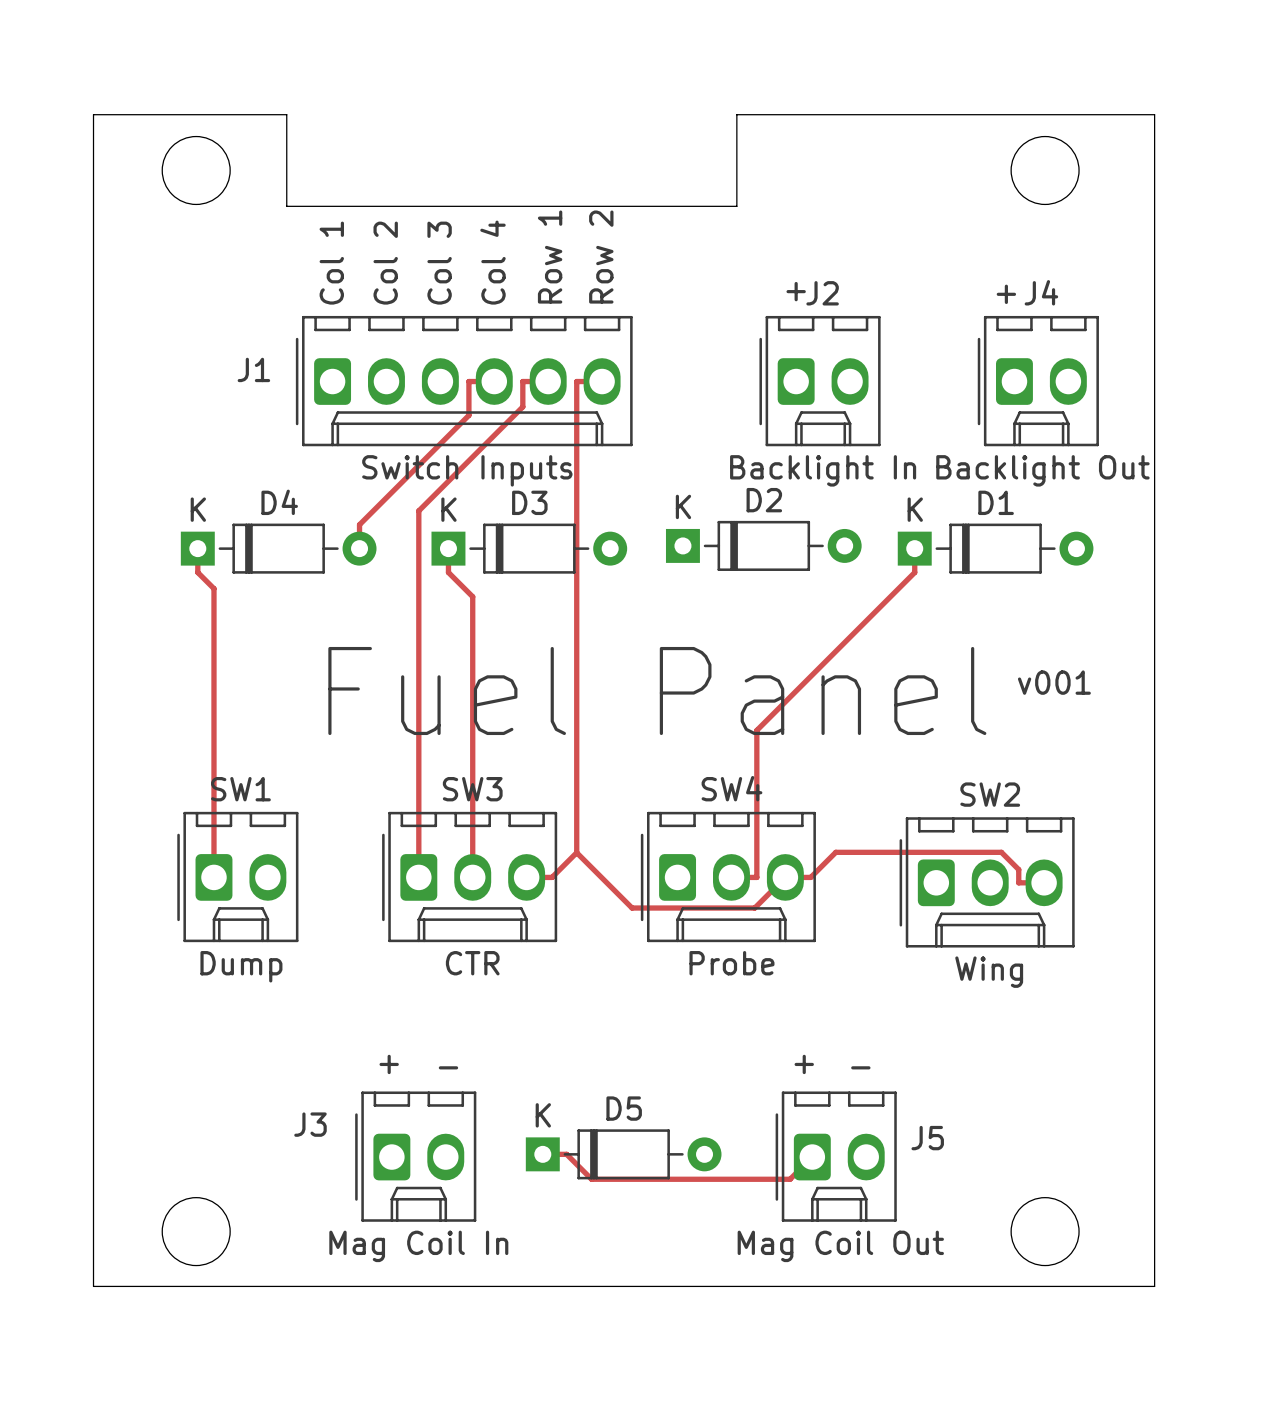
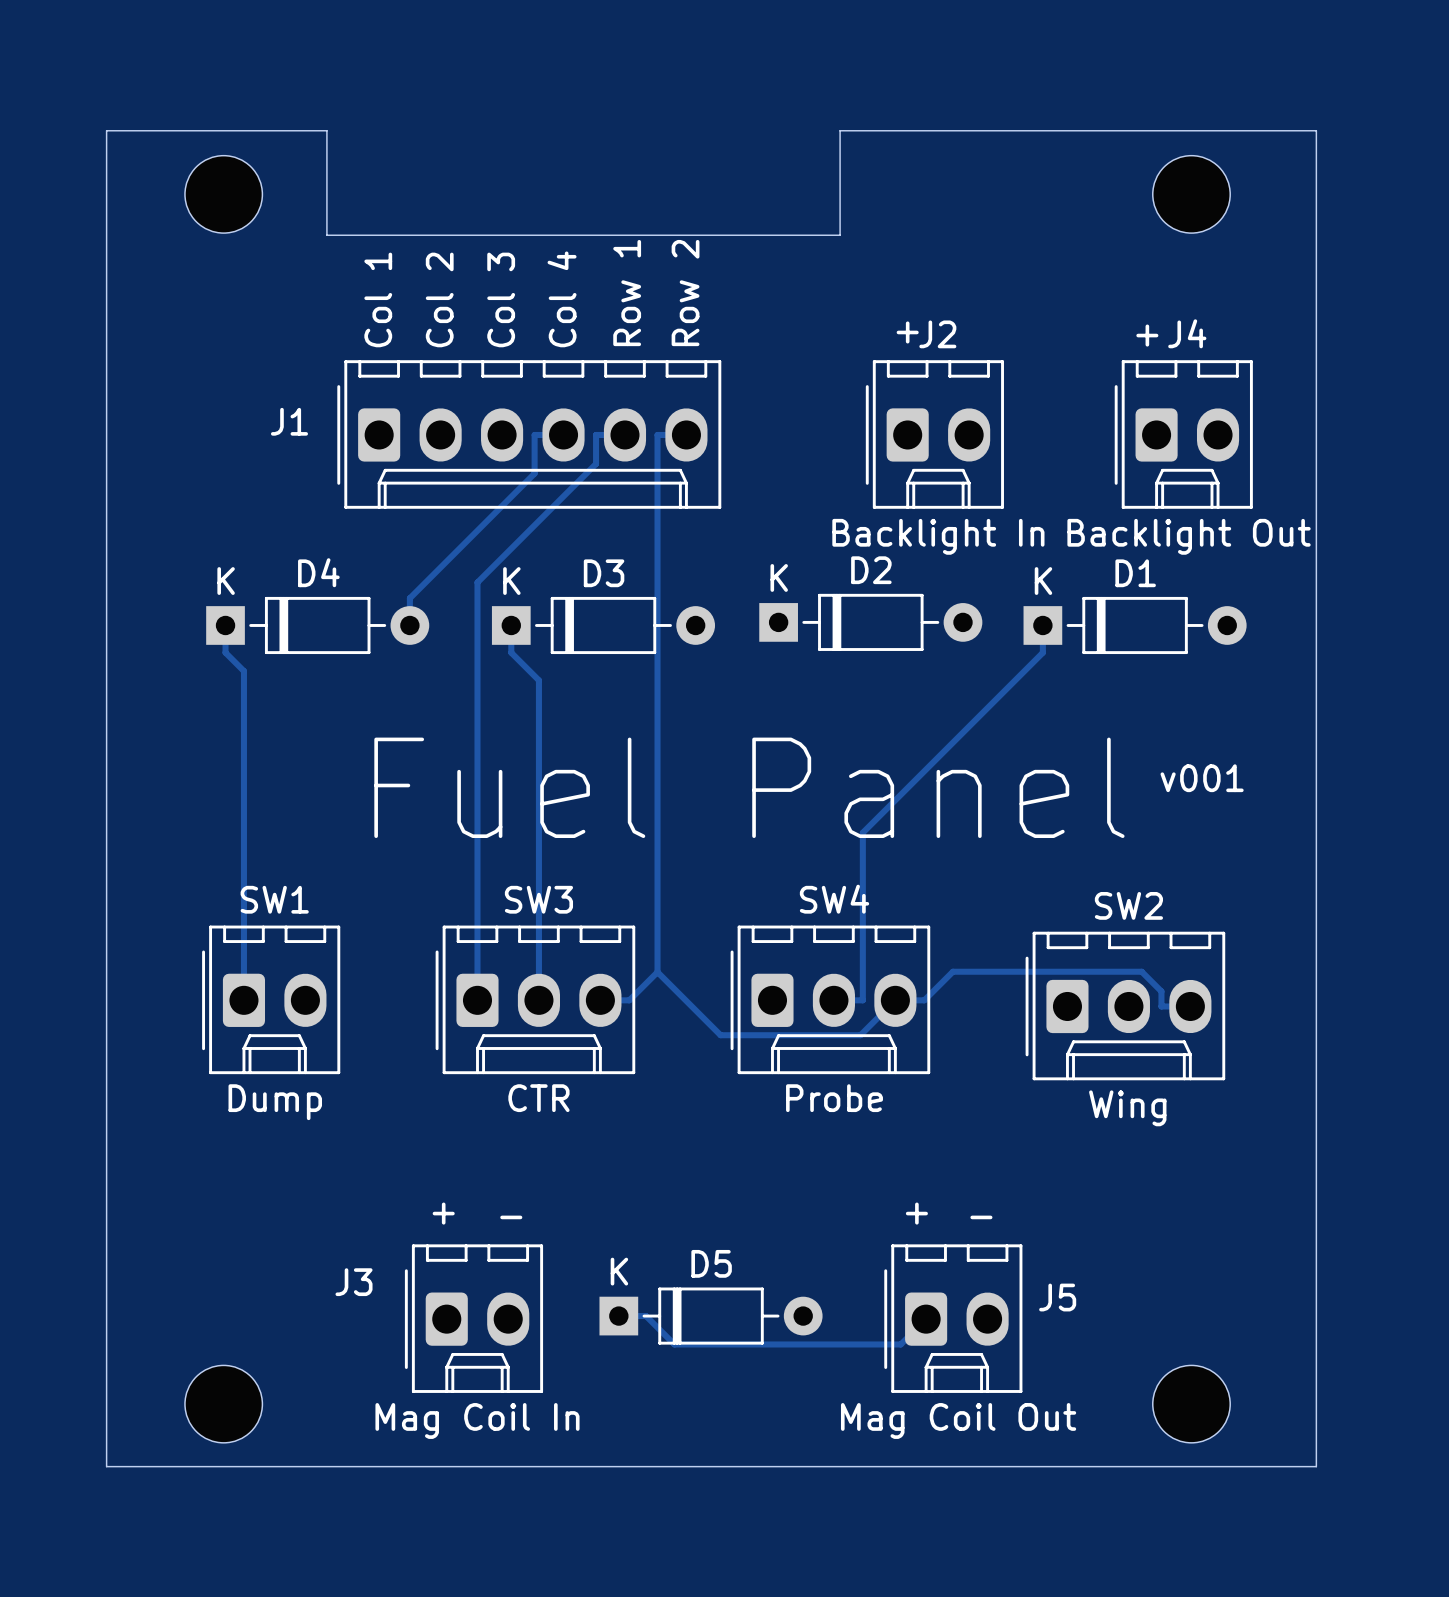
J1 value: Switch Inputs (467, 470) -> none

